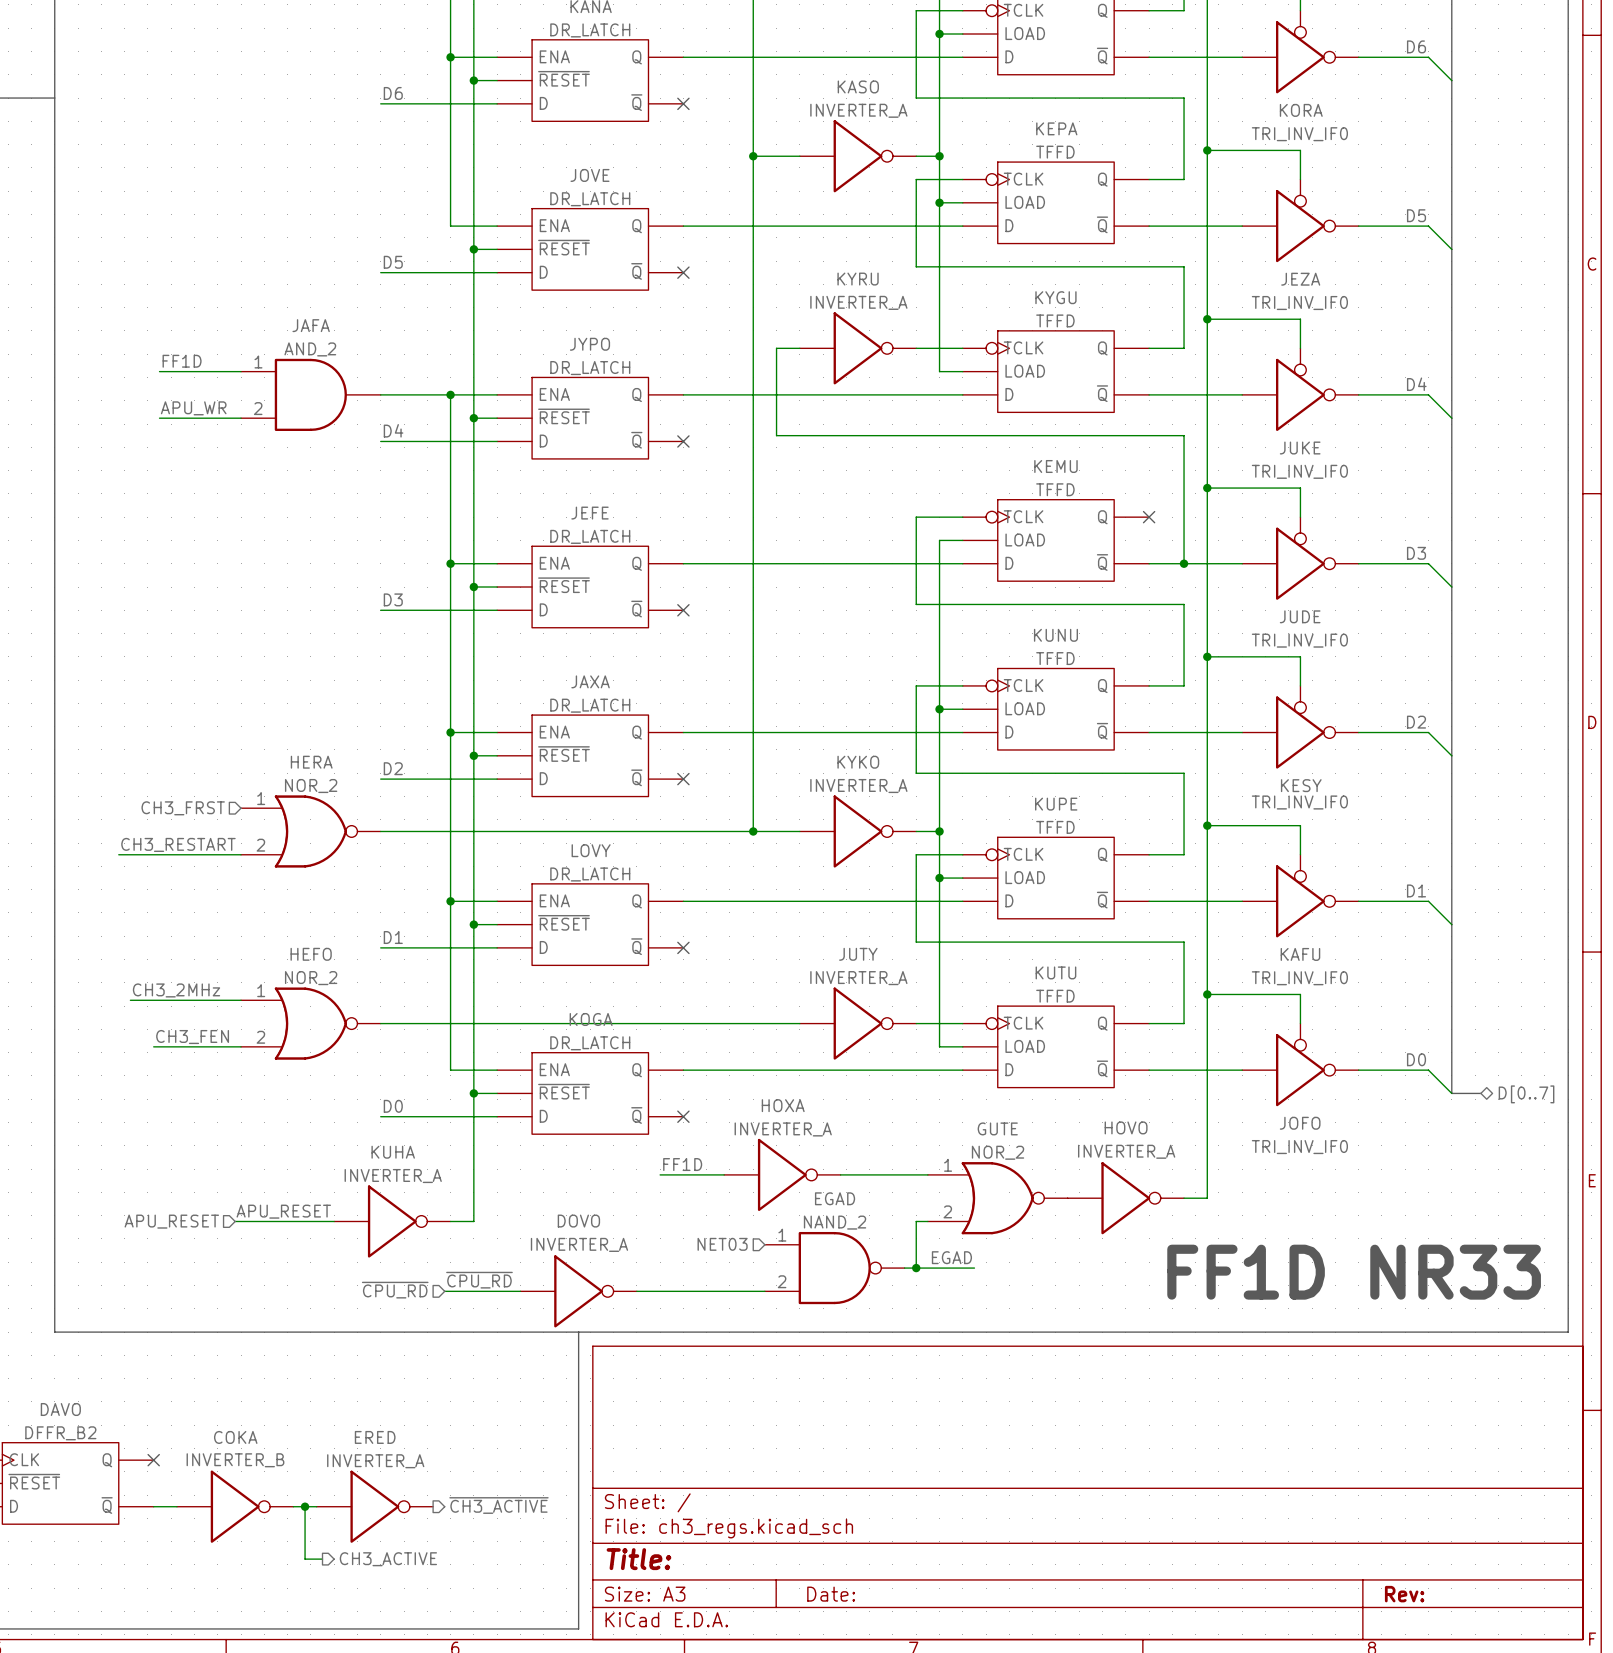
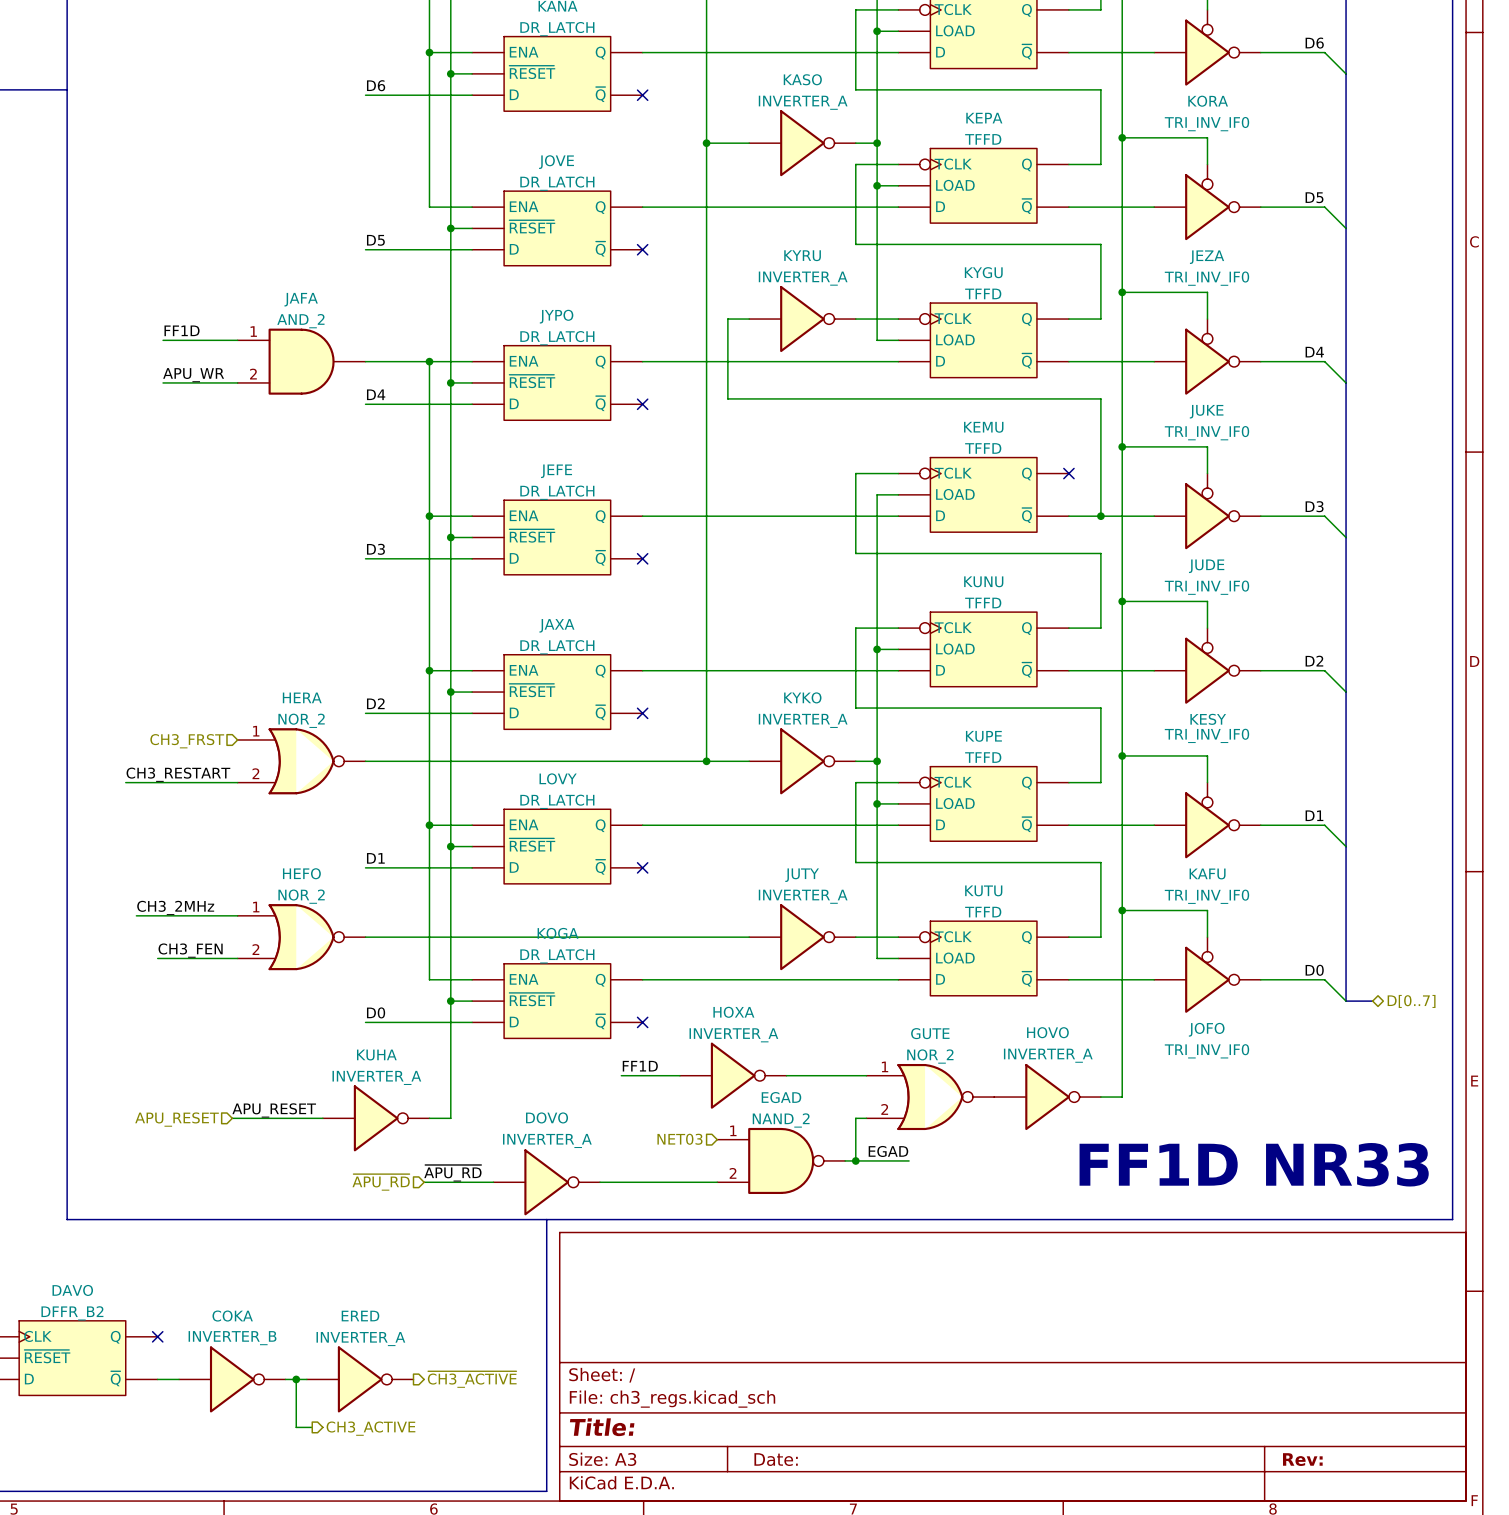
label: ~{CPU_RD} (479, 1280) -> ~{APU_RD} (452, 1173)
hierarchical label: ~{CPU_RD} (395, 1290) -> ~{APU_RD} (381, 1182)

